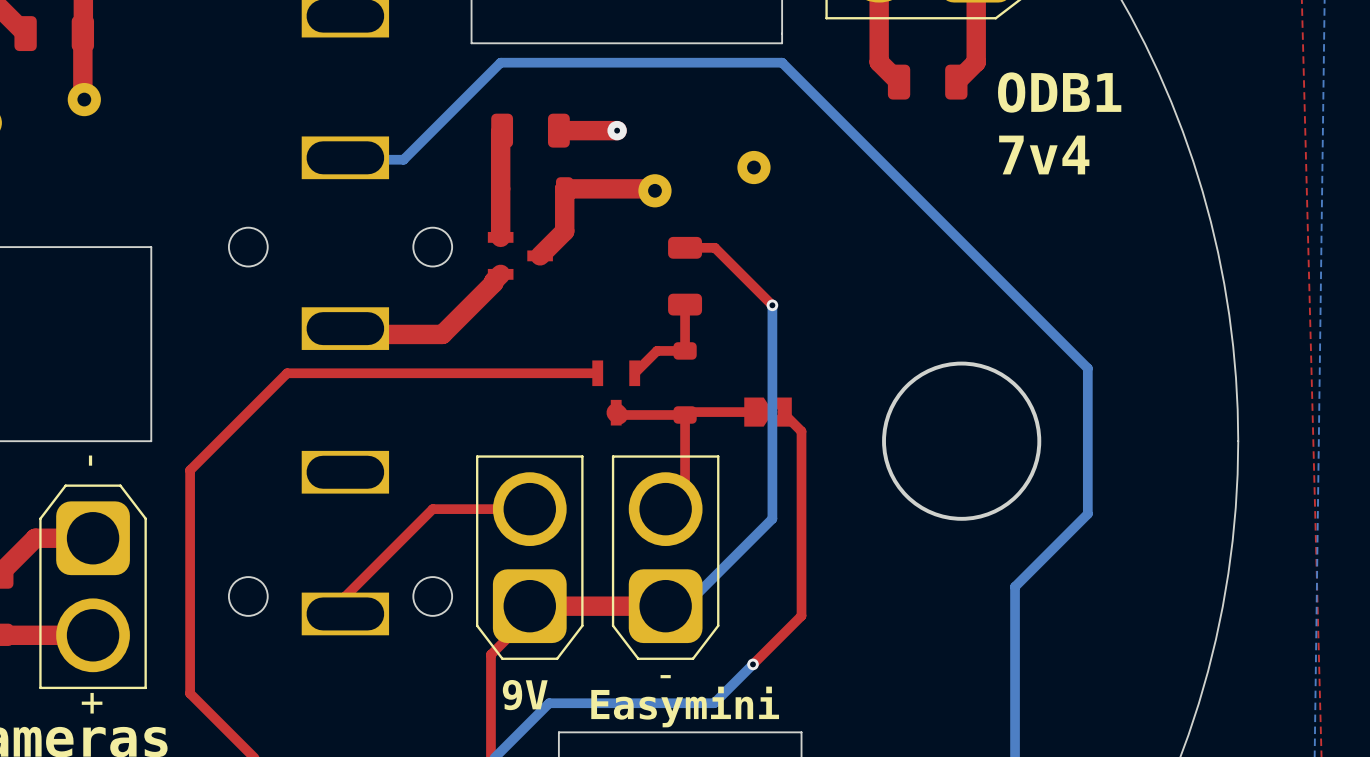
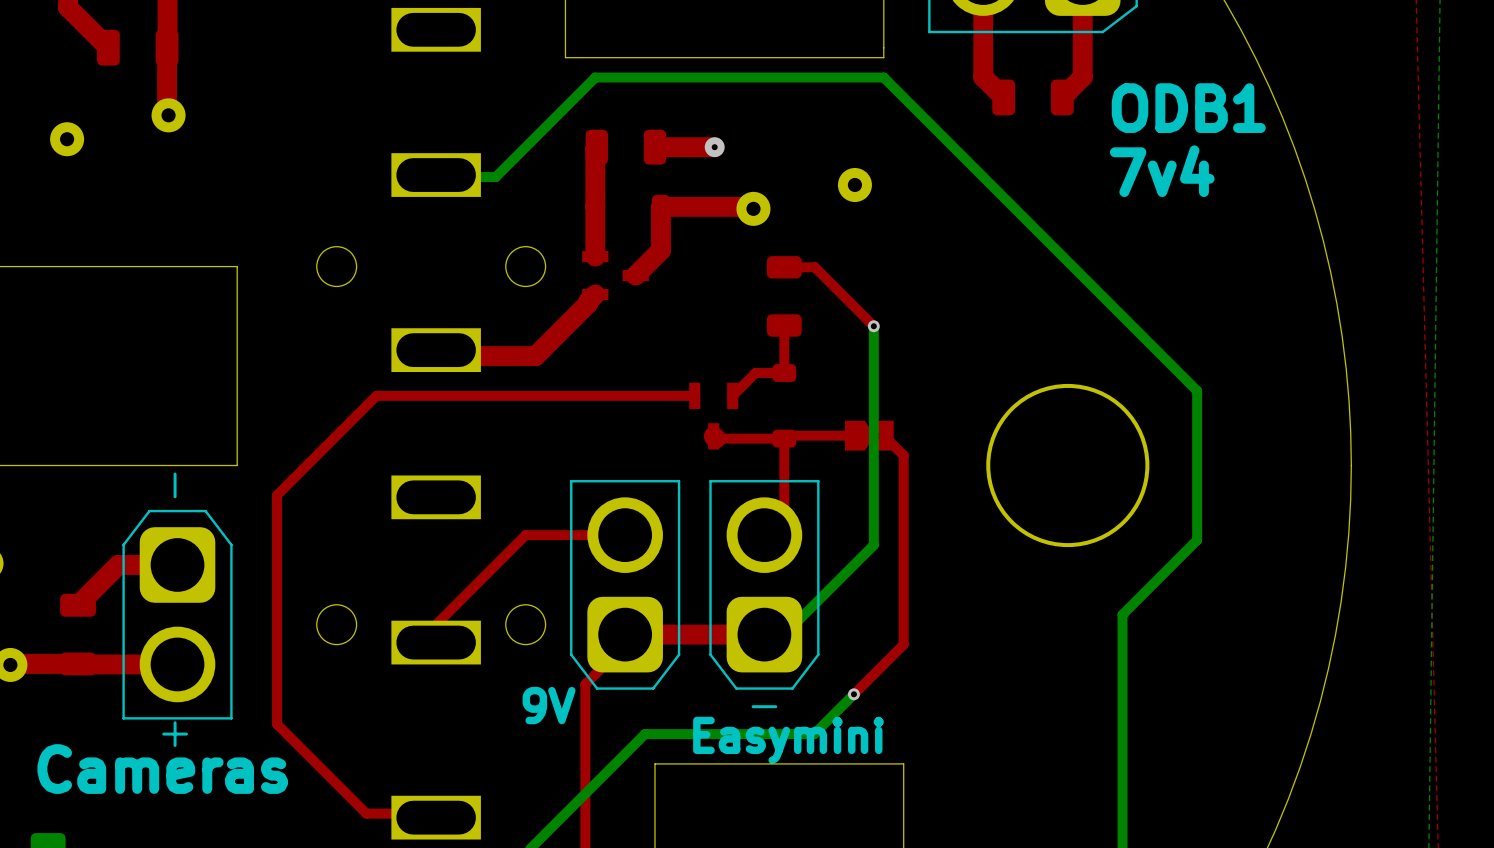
text position: 9V (525, 695) -> 9V (549, 705)

